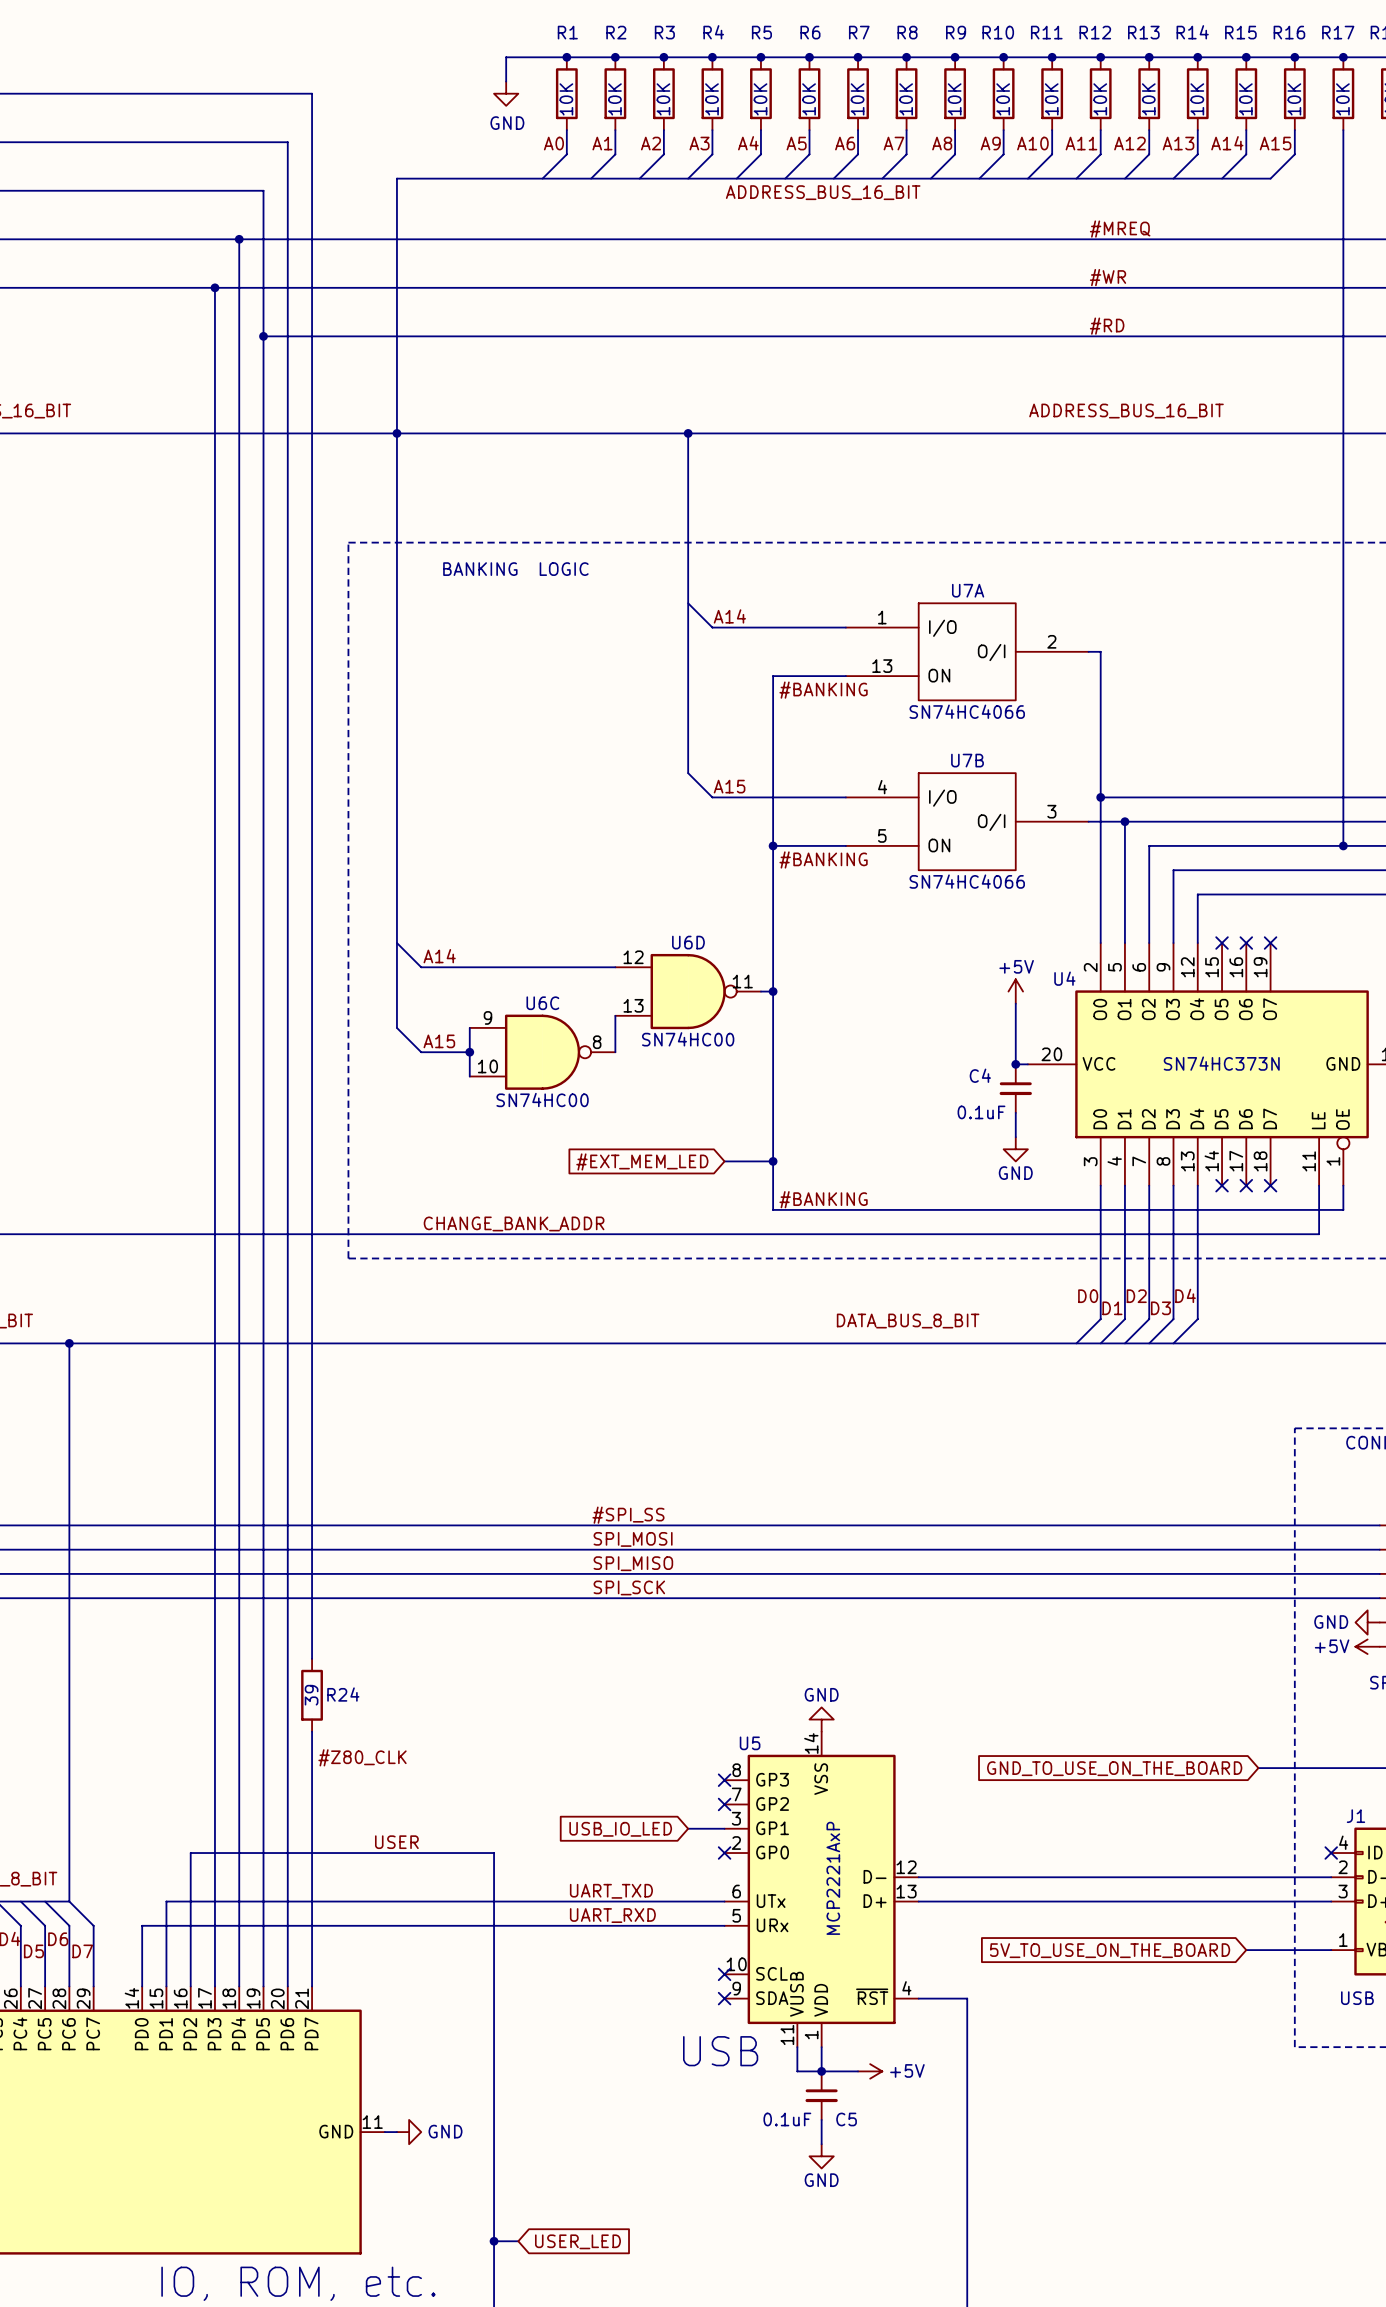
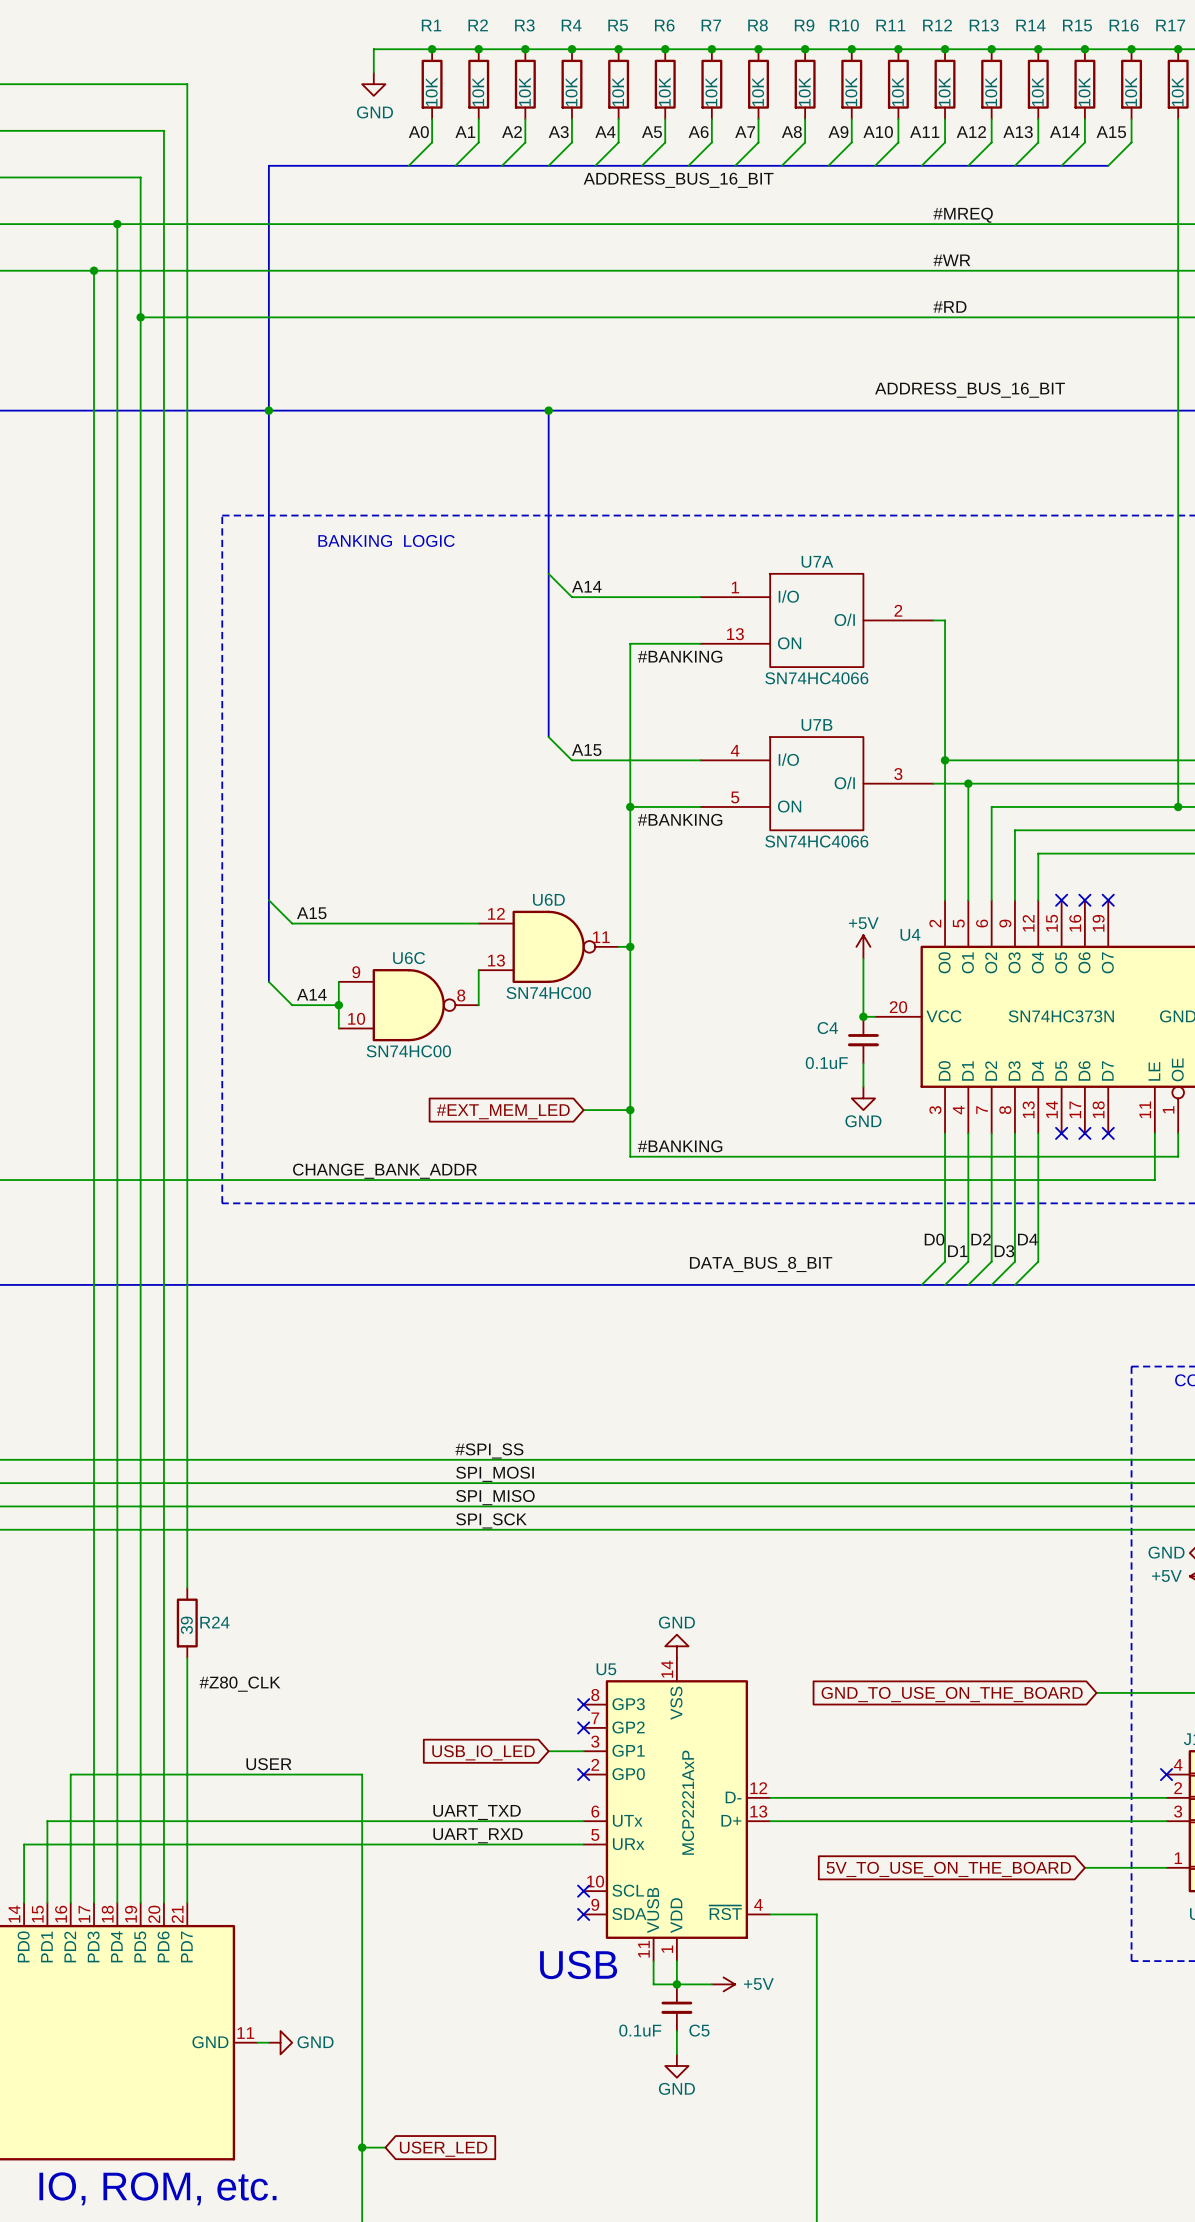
label: A14 (439, 956) -> A15 (311, 913)
label: A15 (439, 1041) -> A14 (311, 994)

